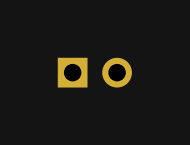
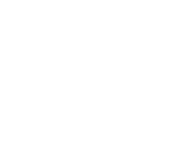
part: (94, 72) -> none

